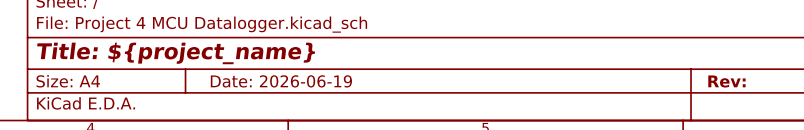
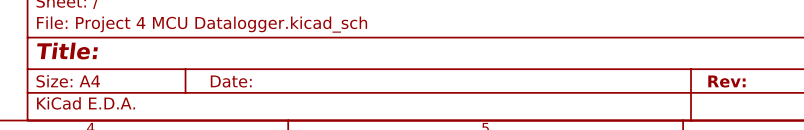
title block: Title: ${project_name} (176, 53) -> Title: (67, 51)
title block: Date: 2026-06-19 (281, 81) -> Date: (231, 81)

